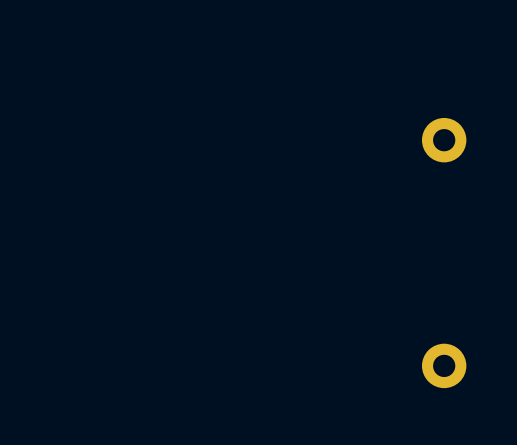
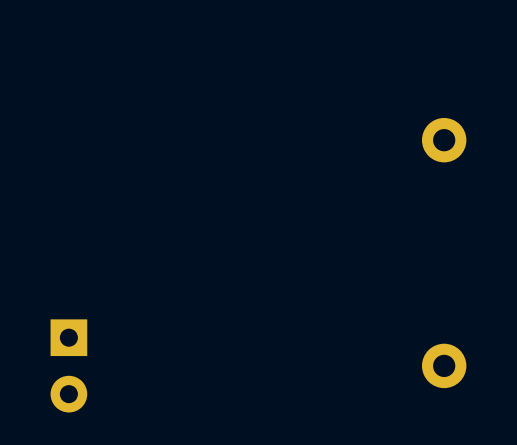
part: none -> (68, 365)

